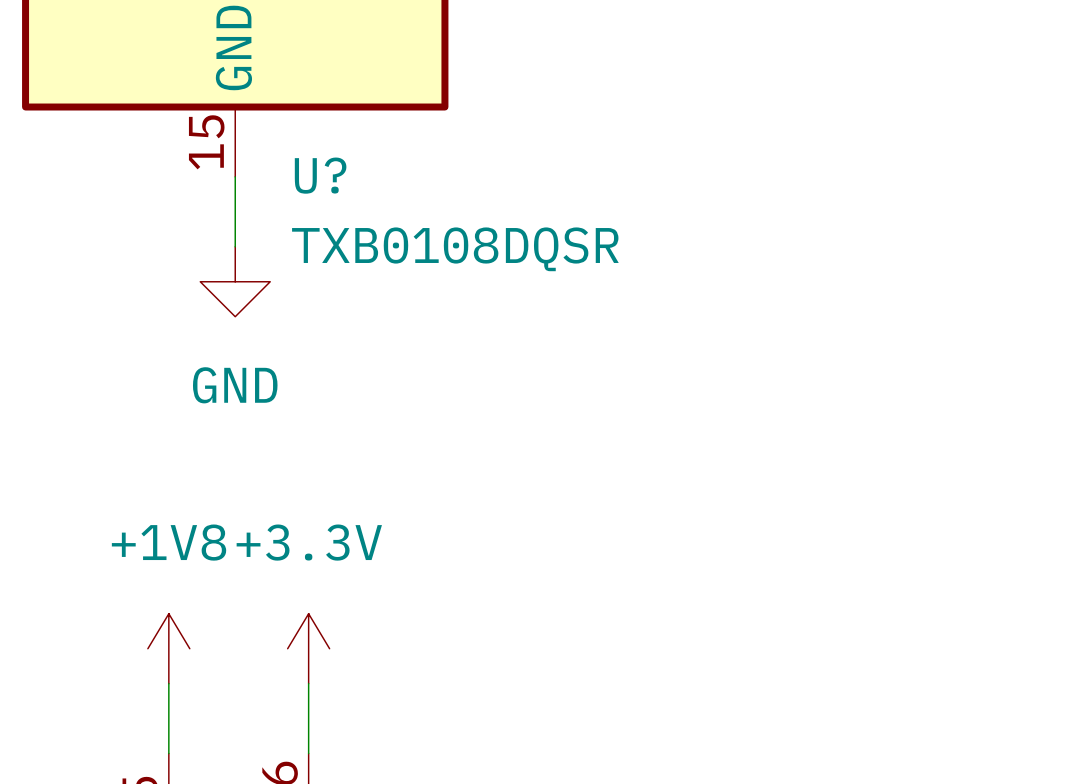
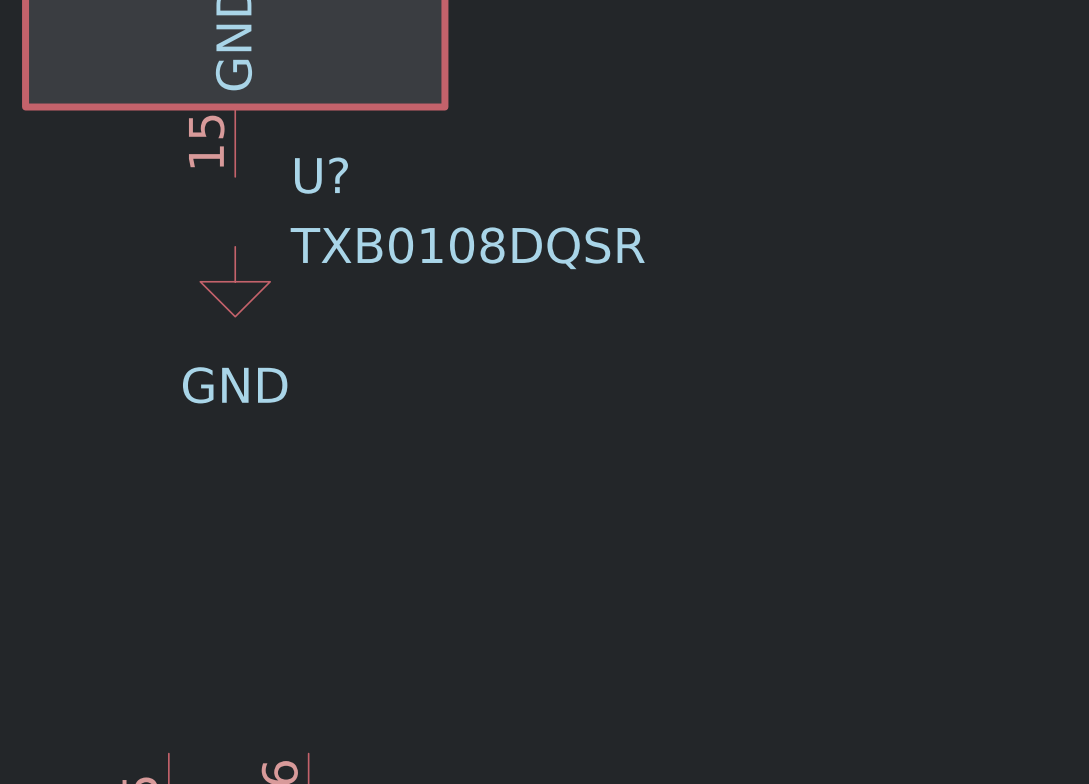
wire: (235, 176) (235, 246) -> none
power symbol: +1V8 (168, 648) -> none
power symbol: +3.3V (308, 648) -> none
wire: (168, 683) (168, 753) -> none
wire: (308, 683) (308, 753) -> none

